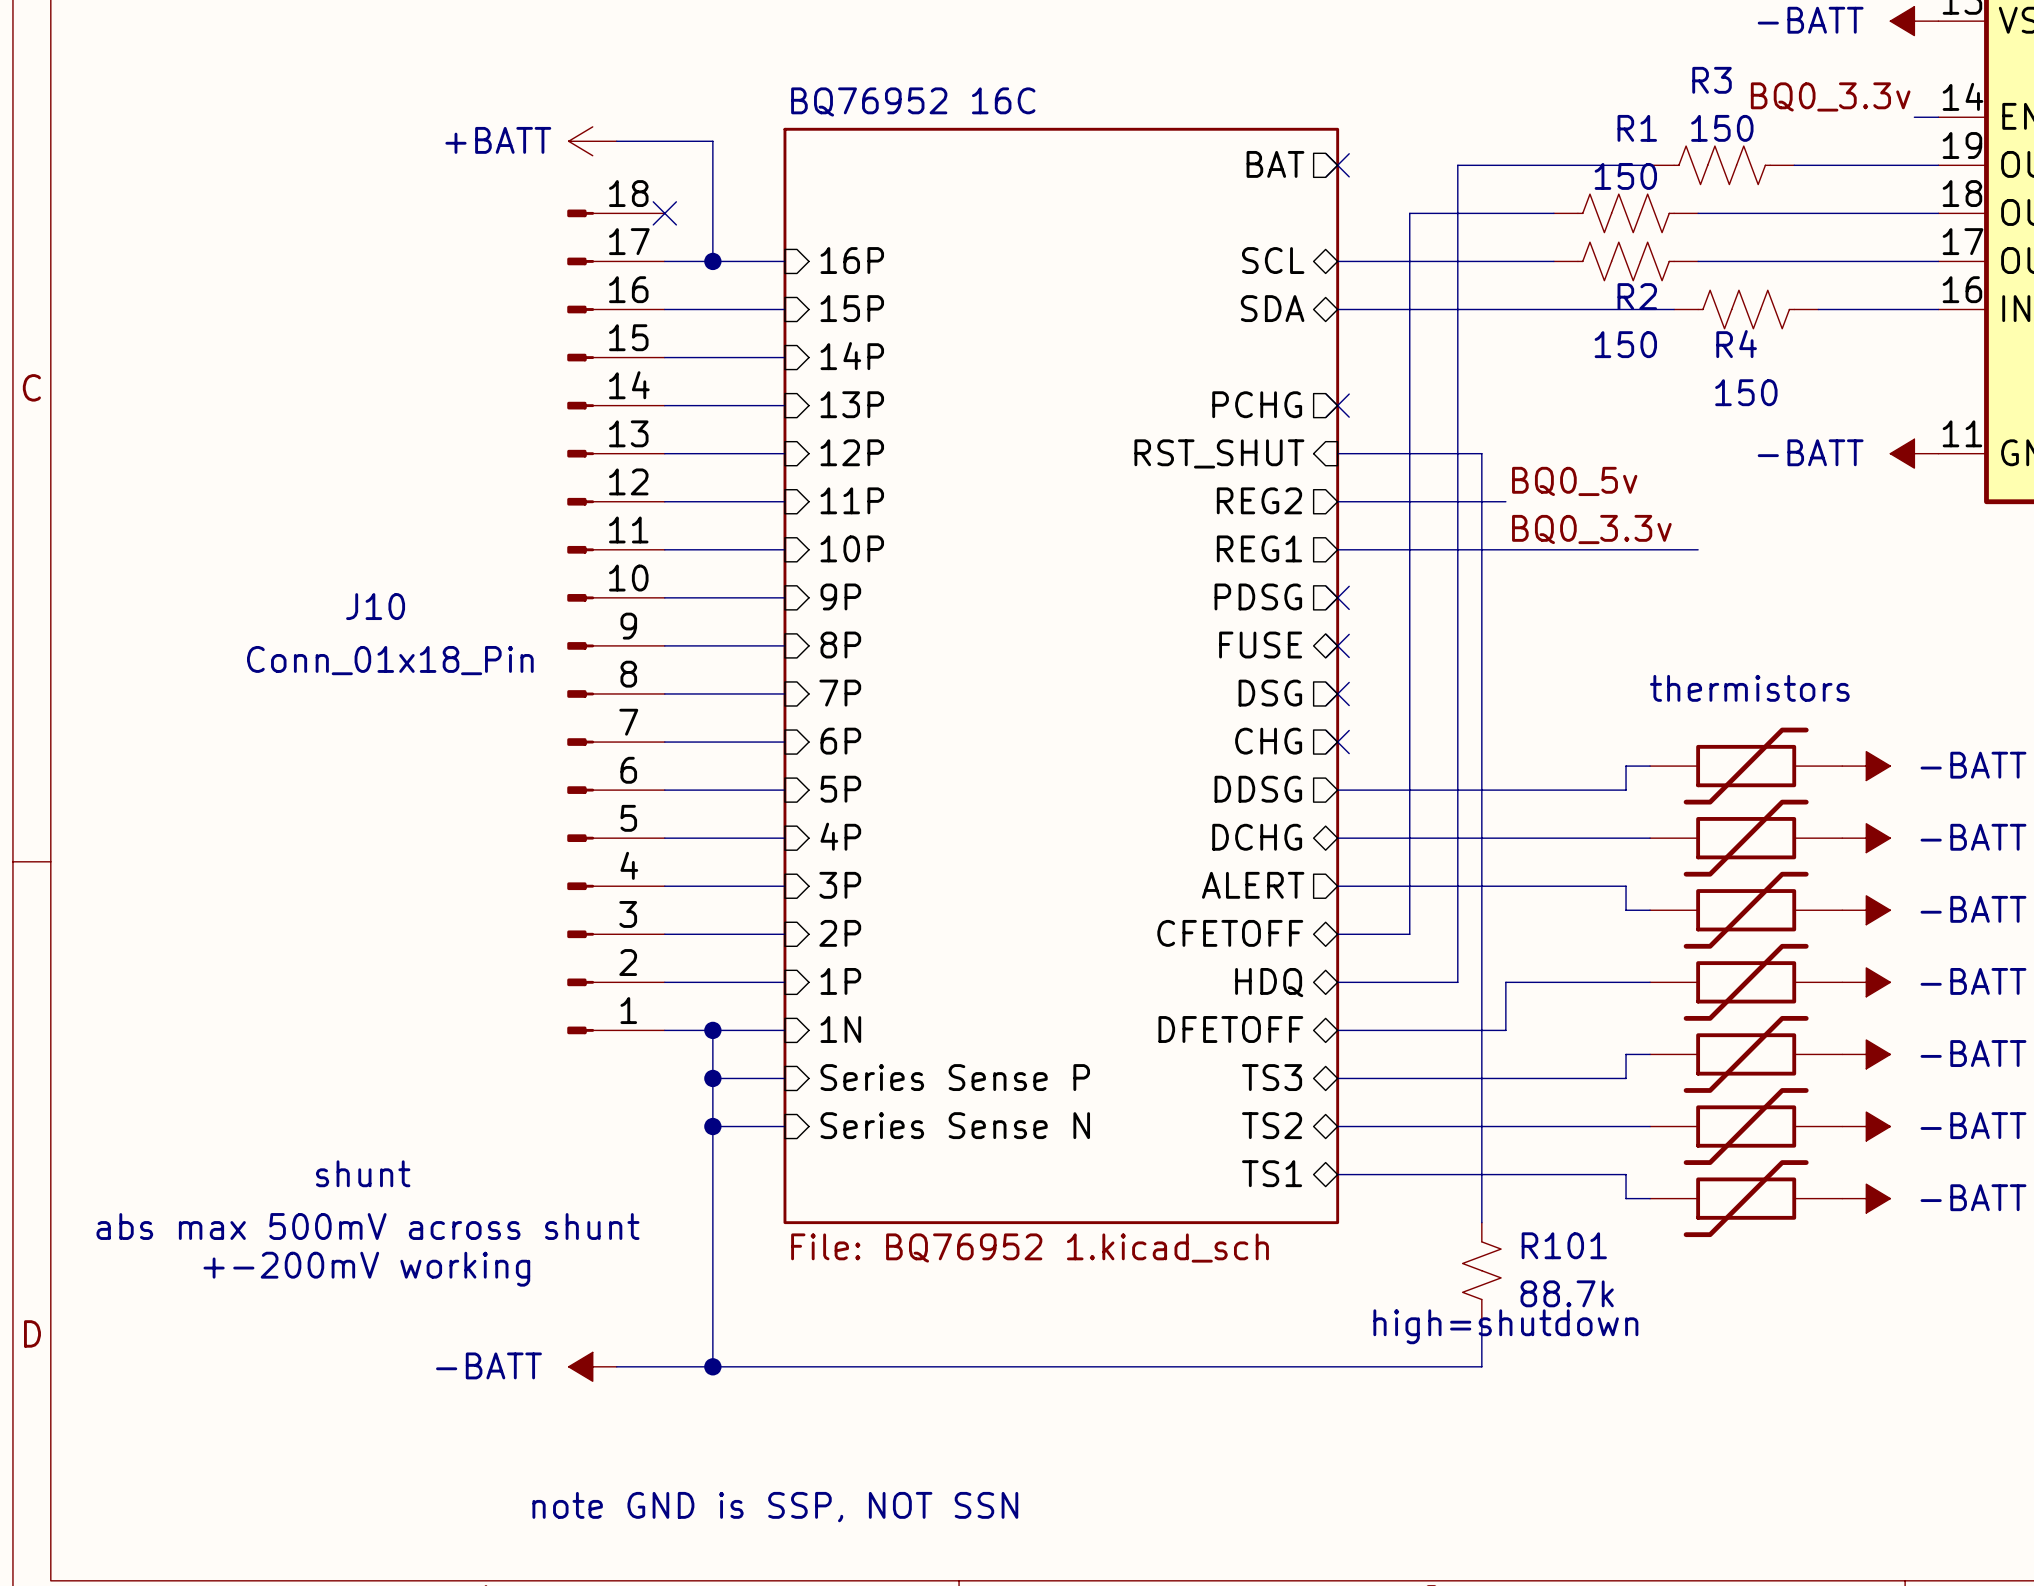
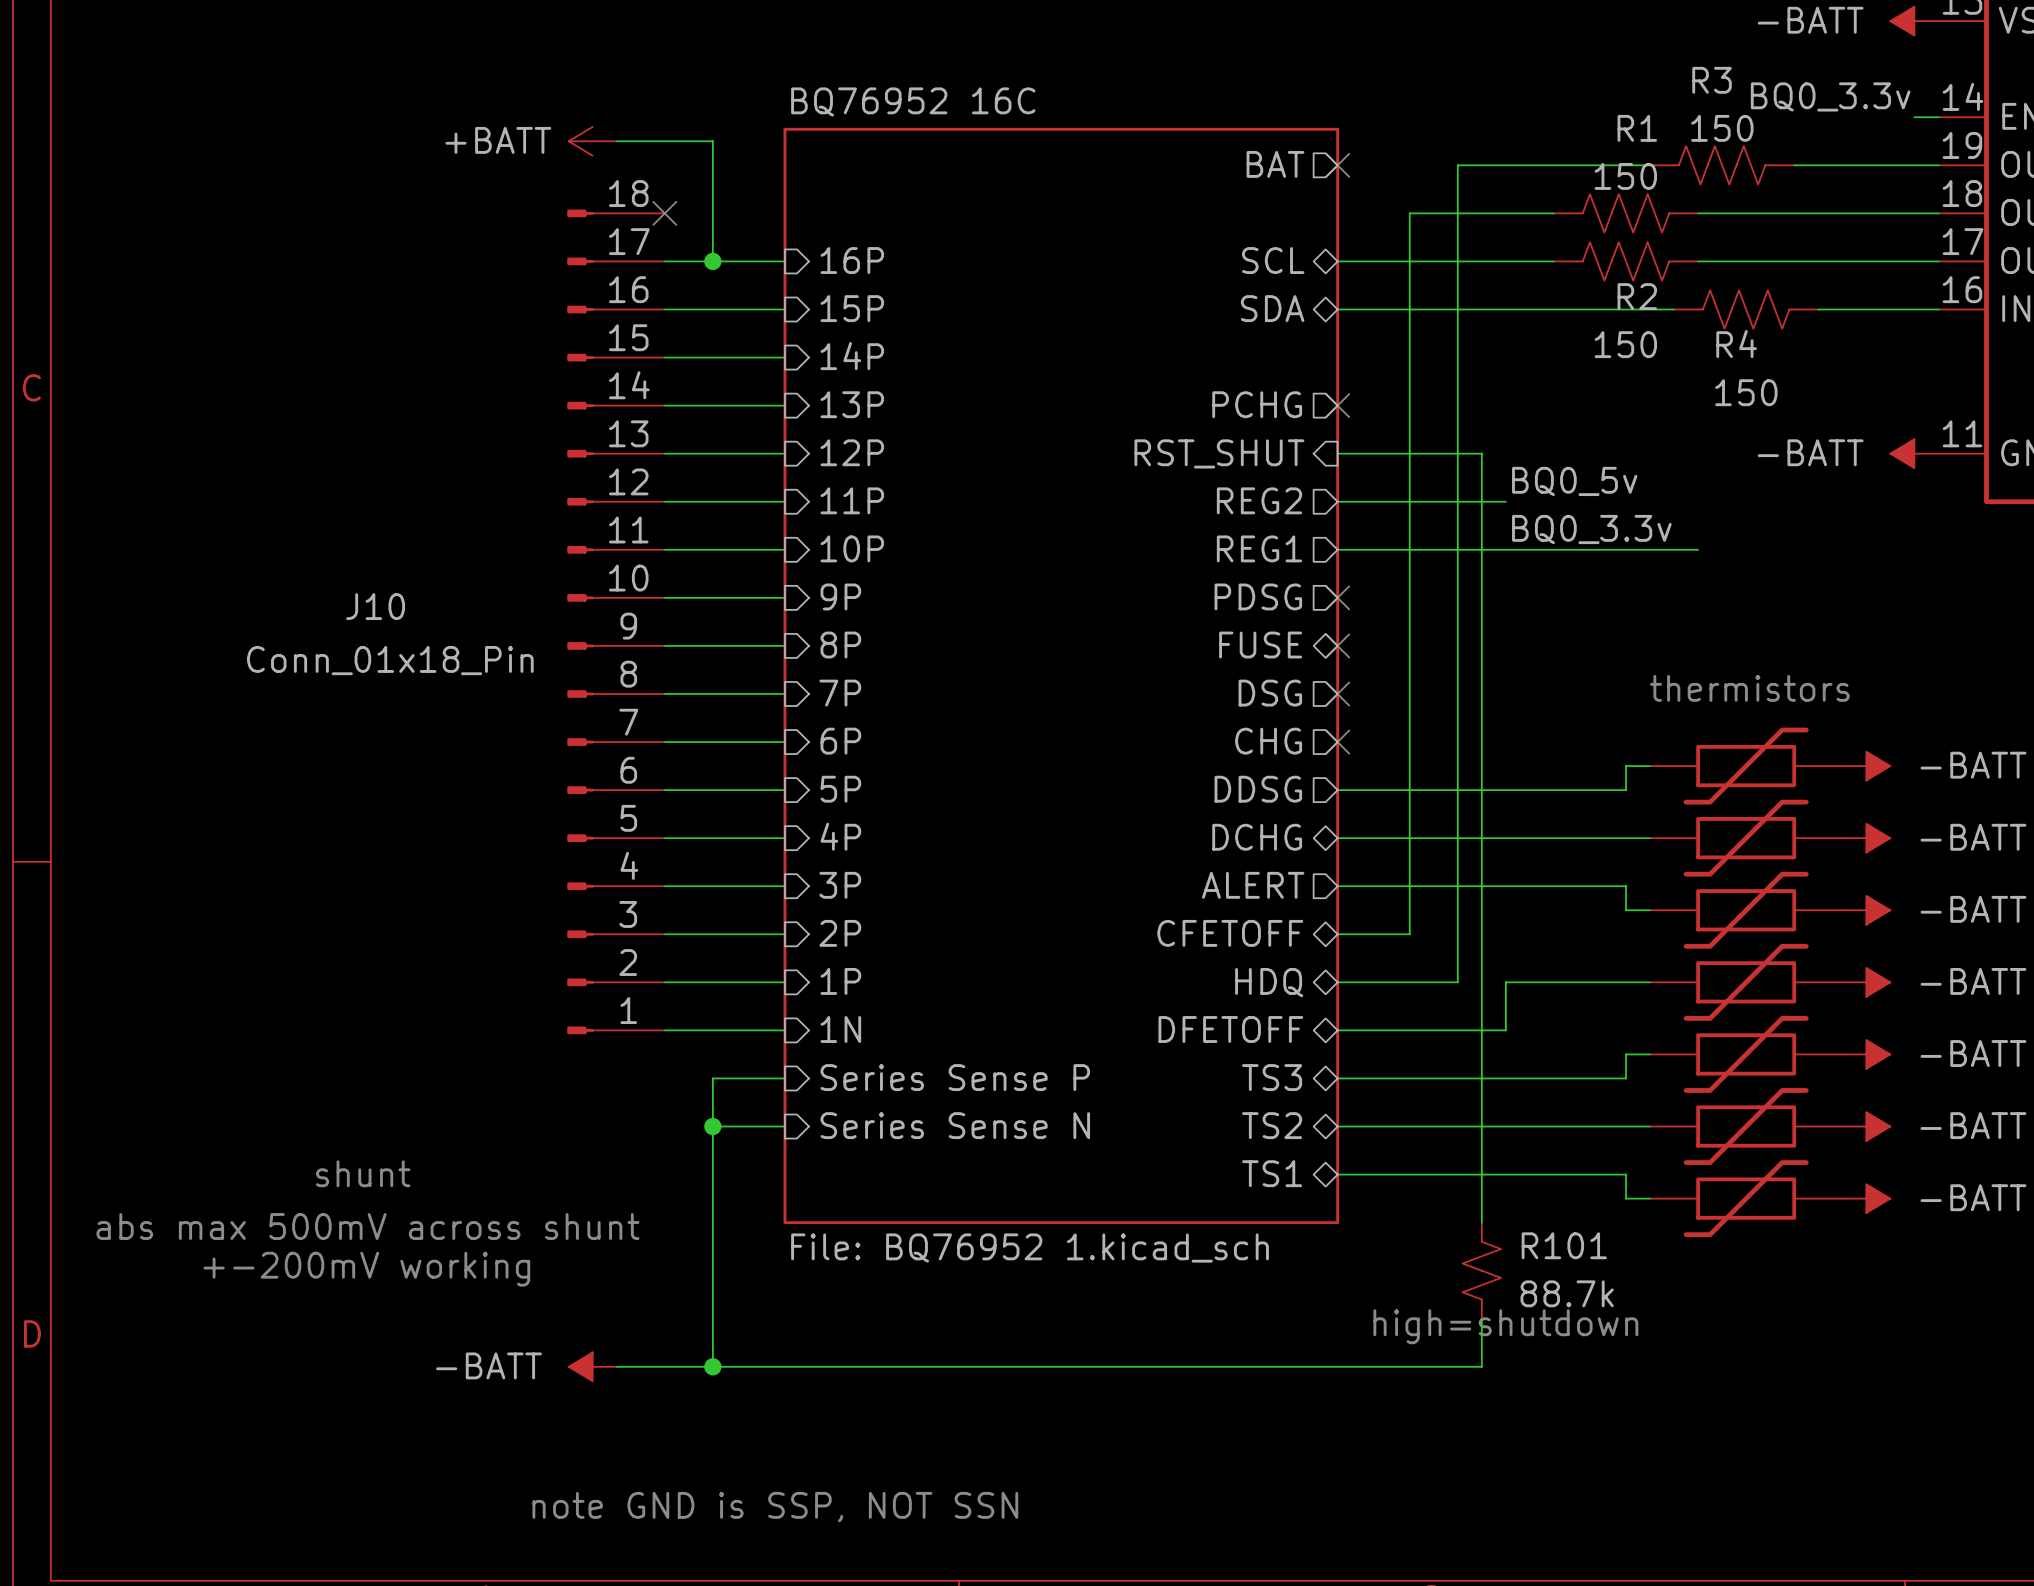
wire: (712, 1030) (712, 1078) -> none
junction: (712, 1030) -> none
junction: (712, 1078) -> none

